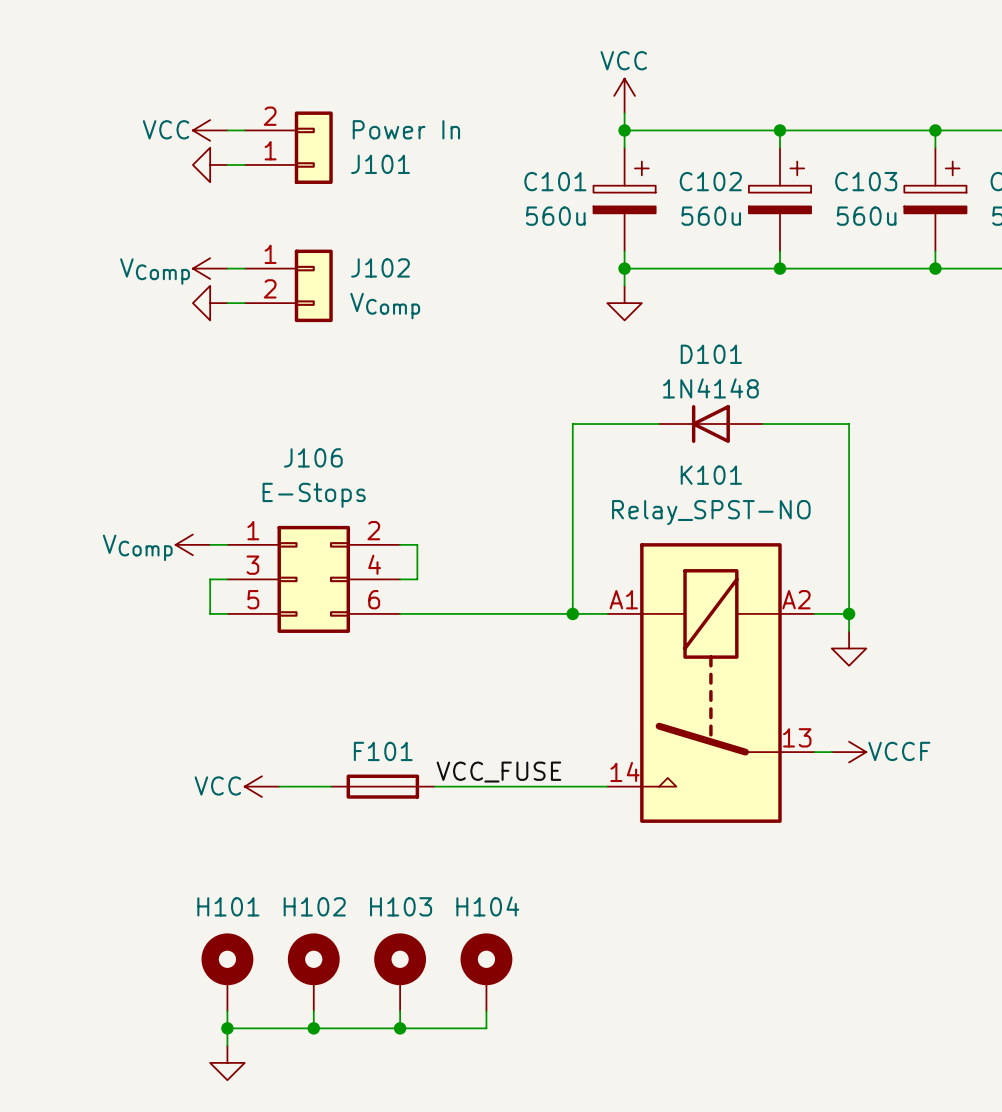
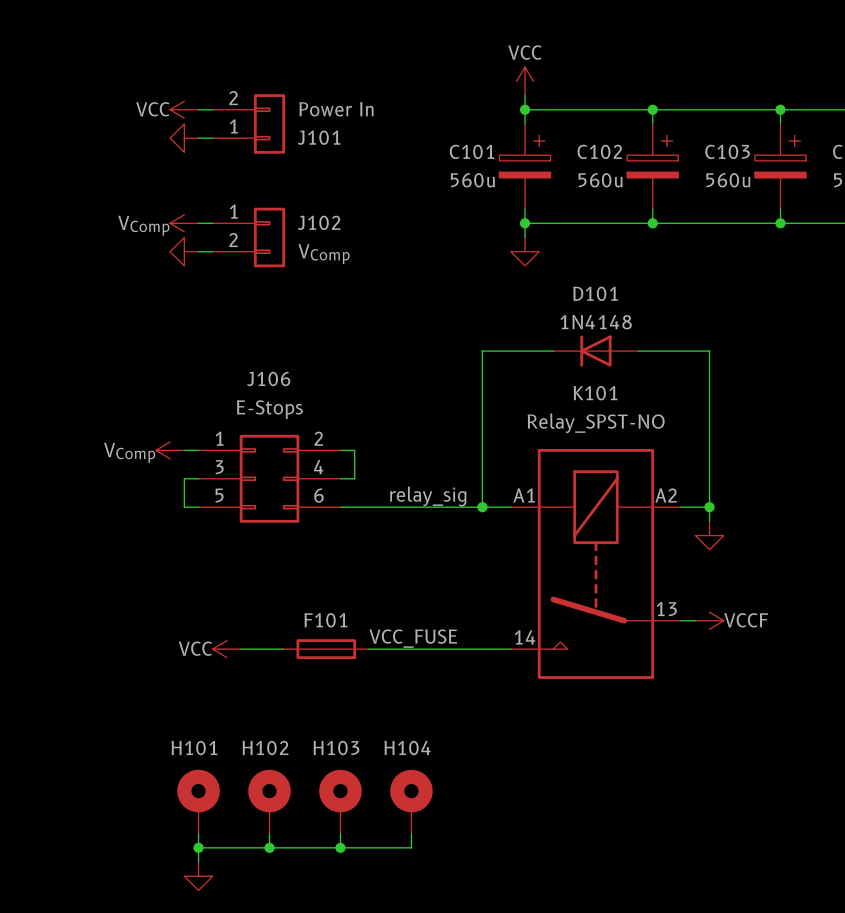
label: none -> relay_sig (428, 496)

